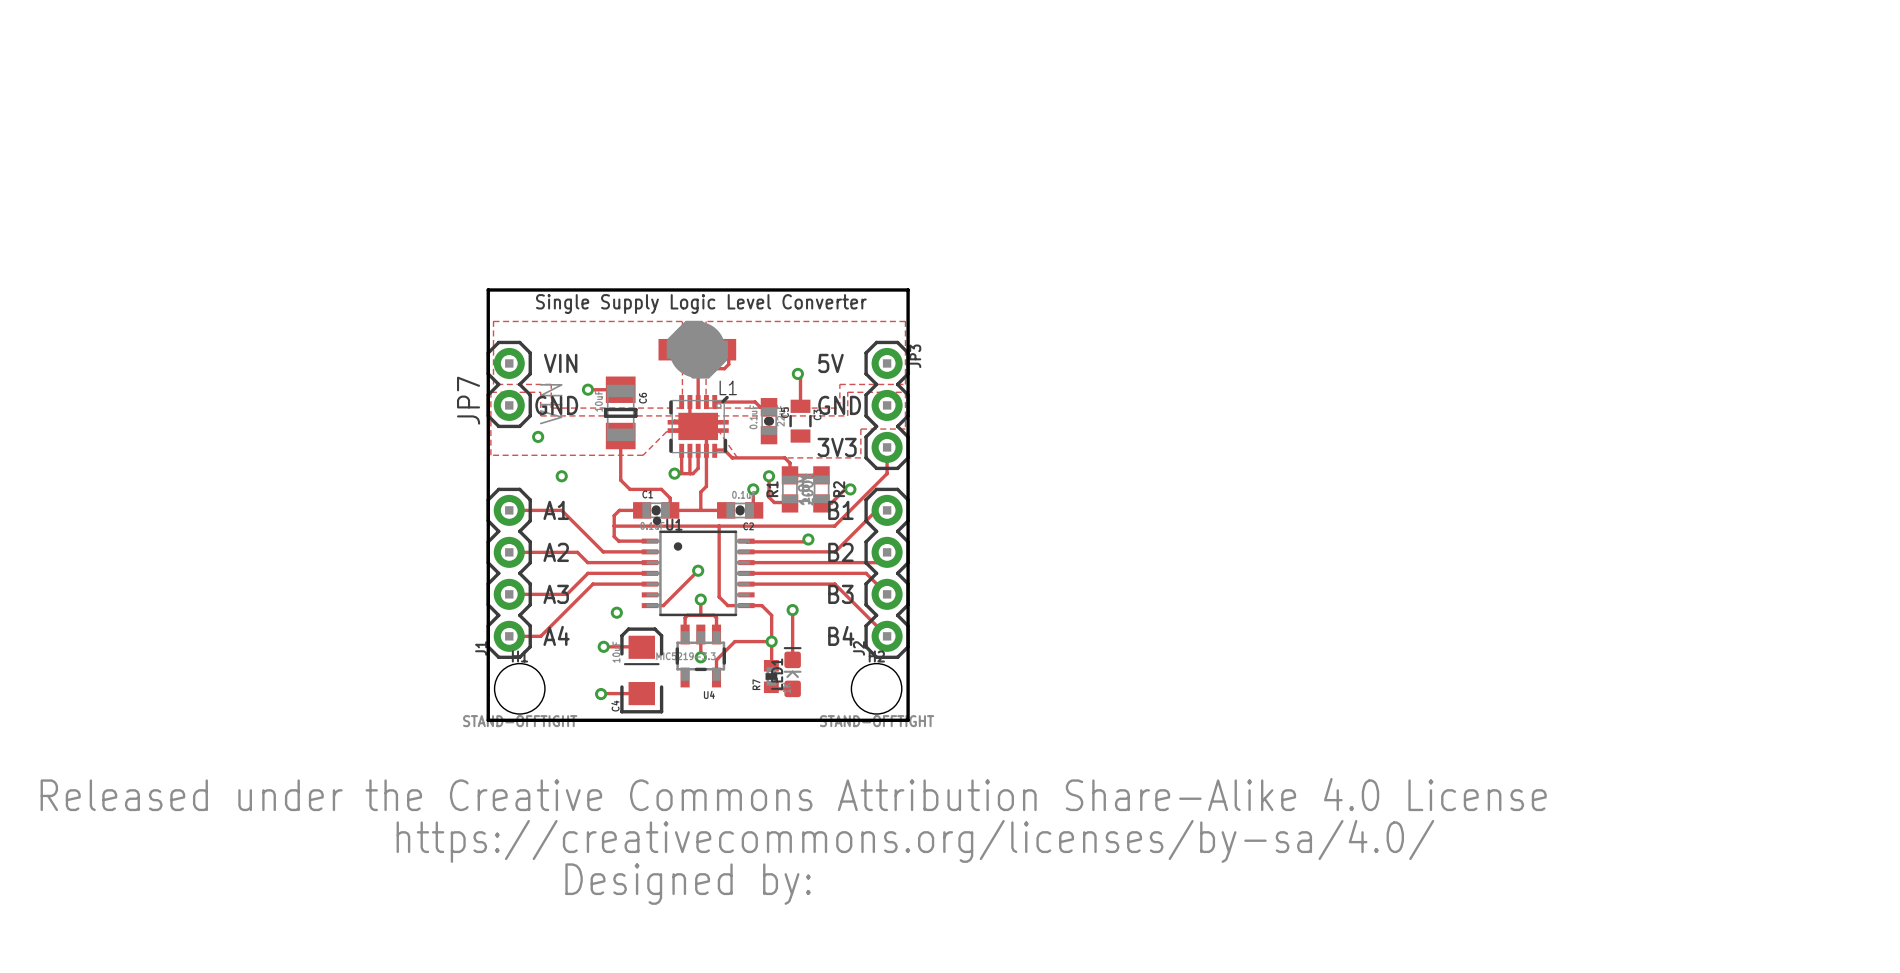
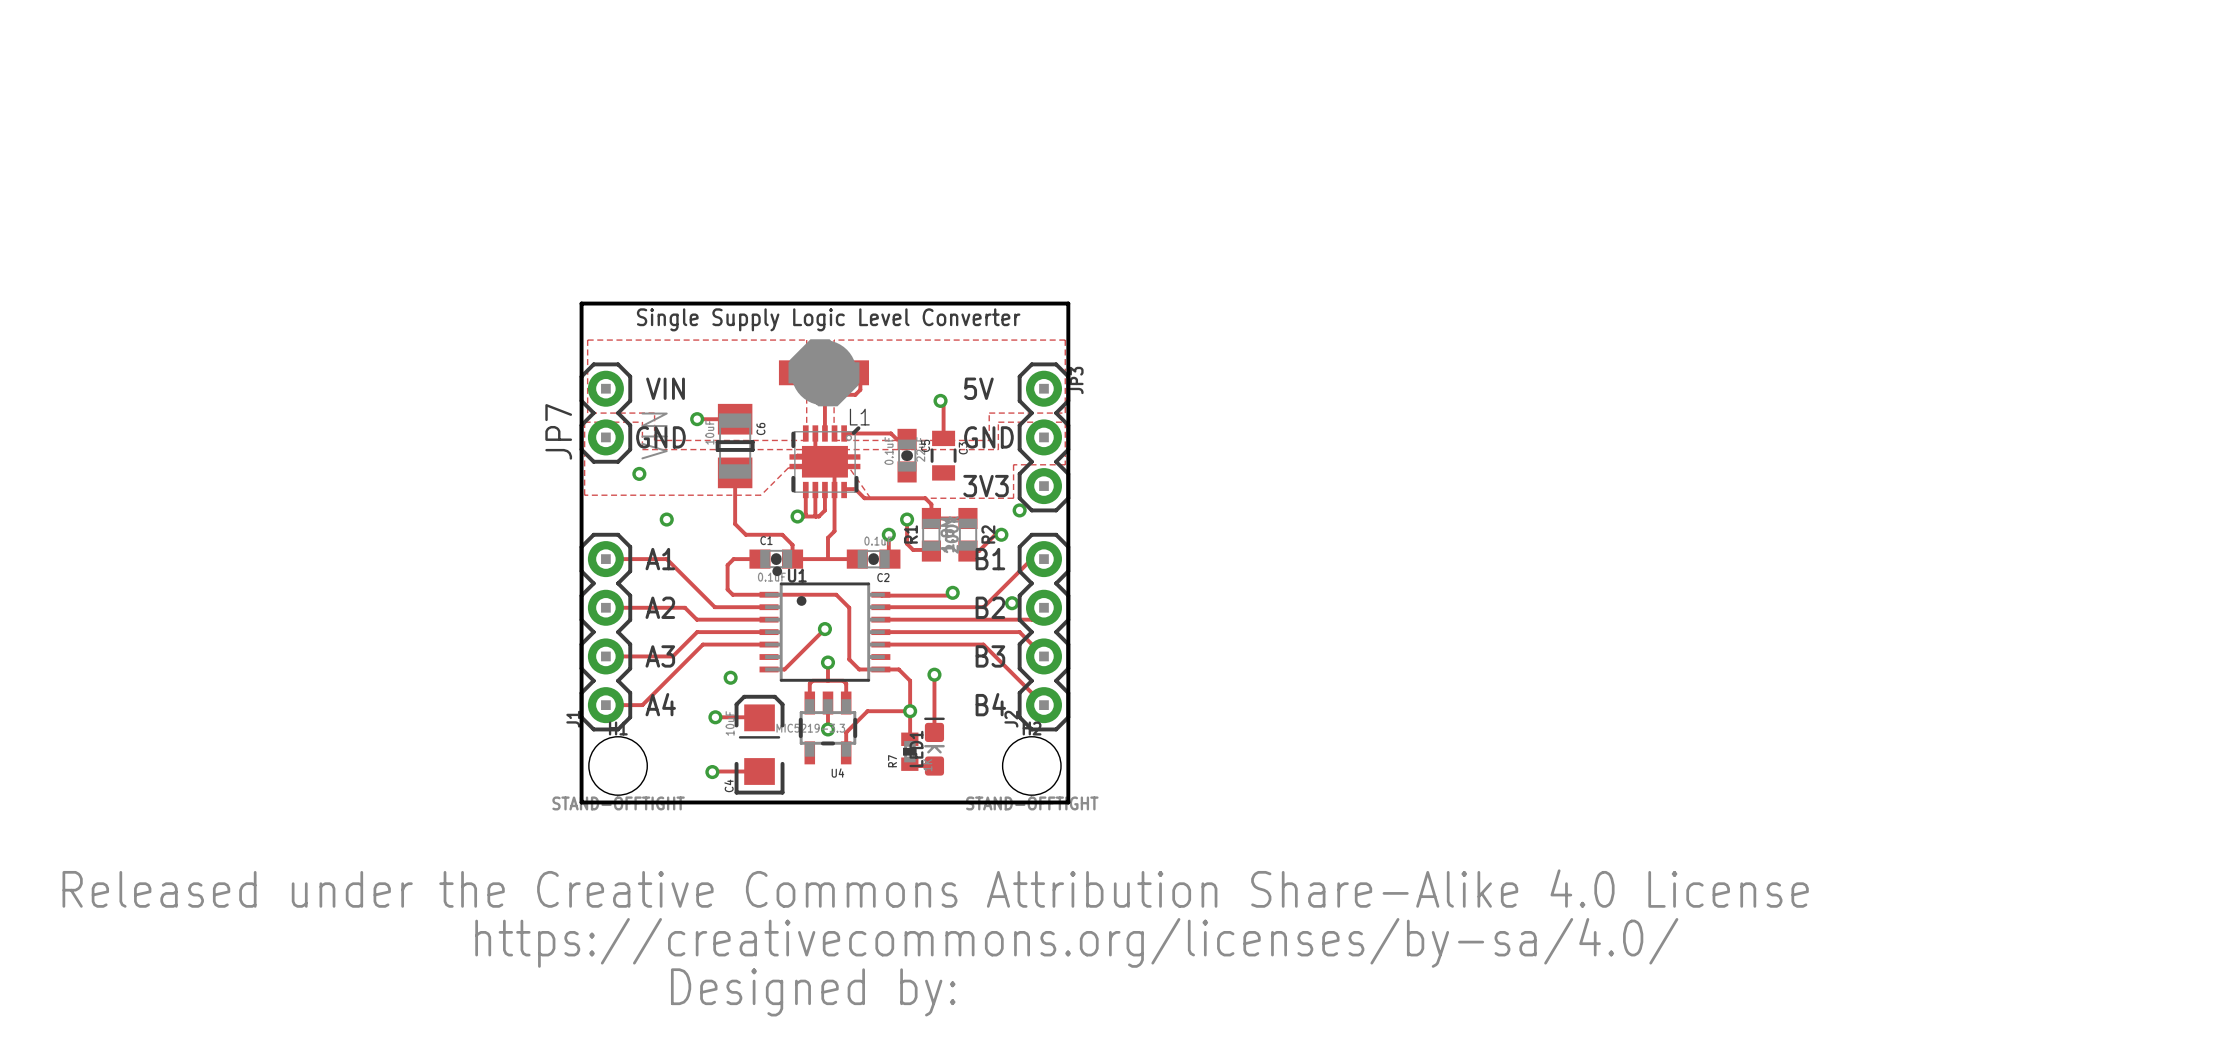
track: (887, 447) (887, 473) (834, 526) (614, 526) -> none
via: none -> (1019, 510)
track: (719, 526) (719, 552) -> (769, 594) (836, 594) (849, 607)
via: none -> (1012, 603)

